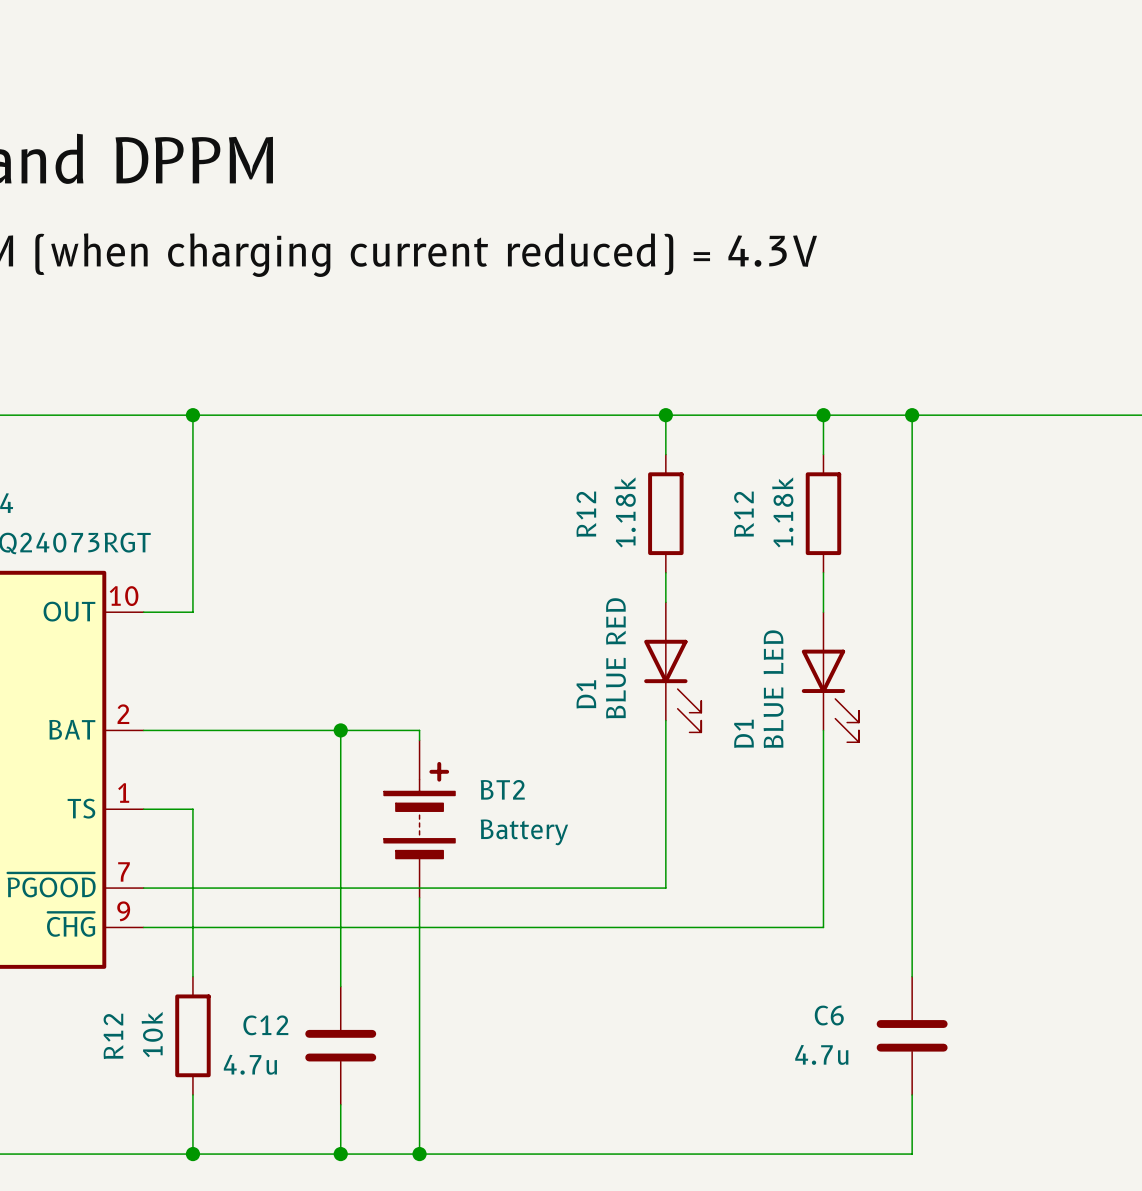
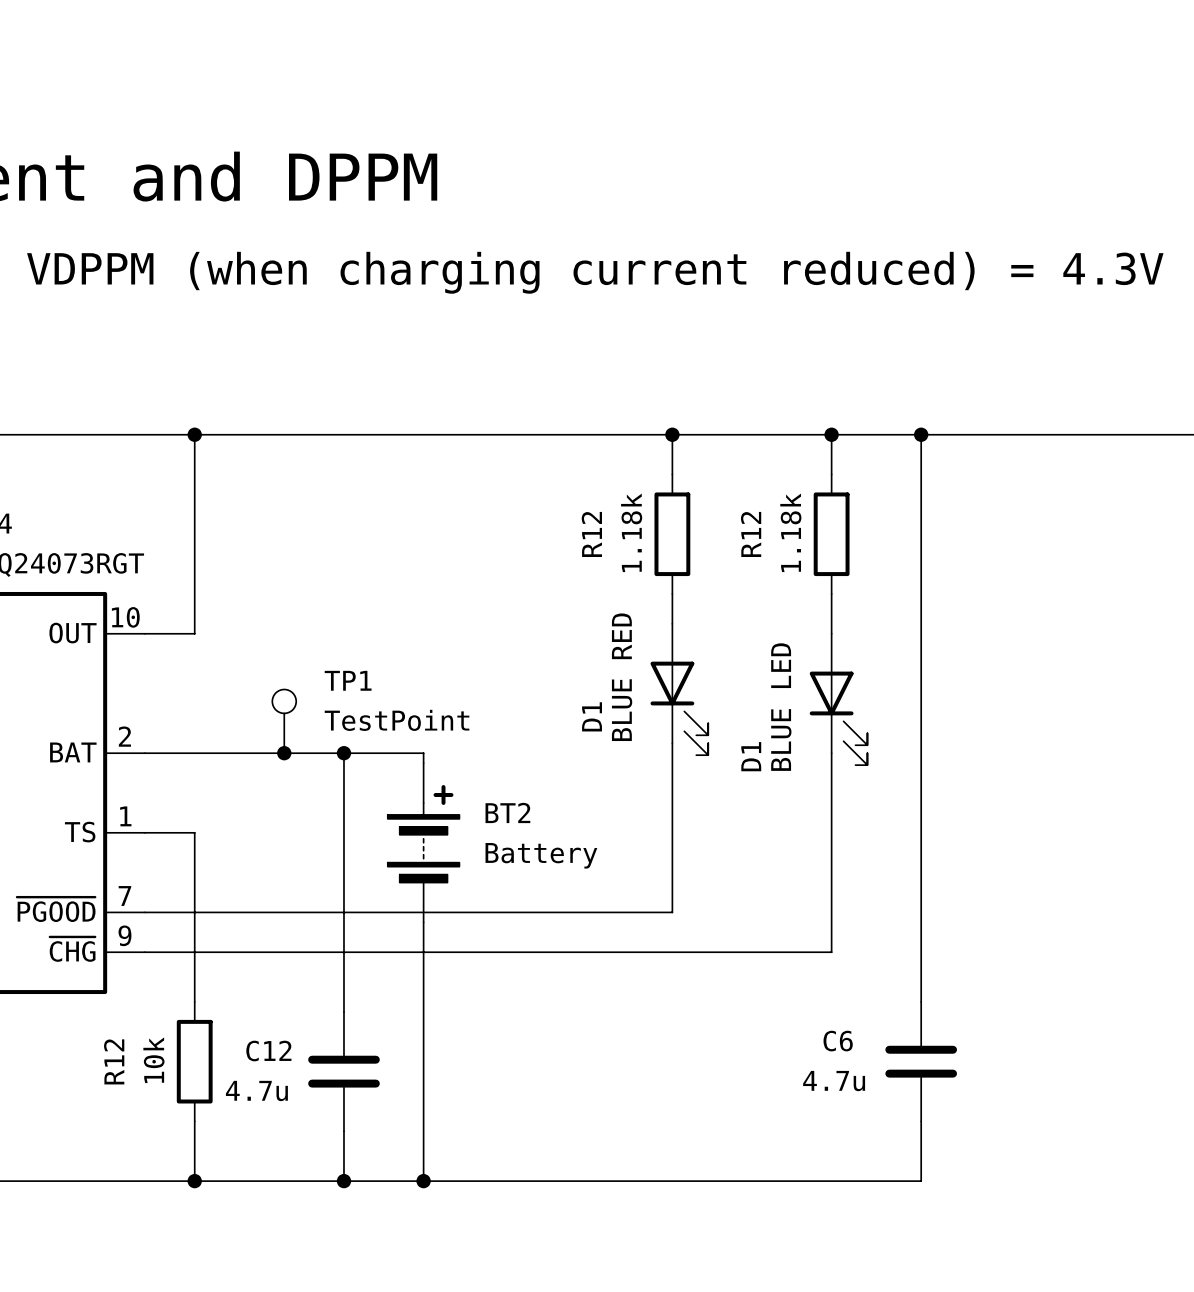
TP1: none -> TestPoint (284, 721)
junction: none -> (284, 753)

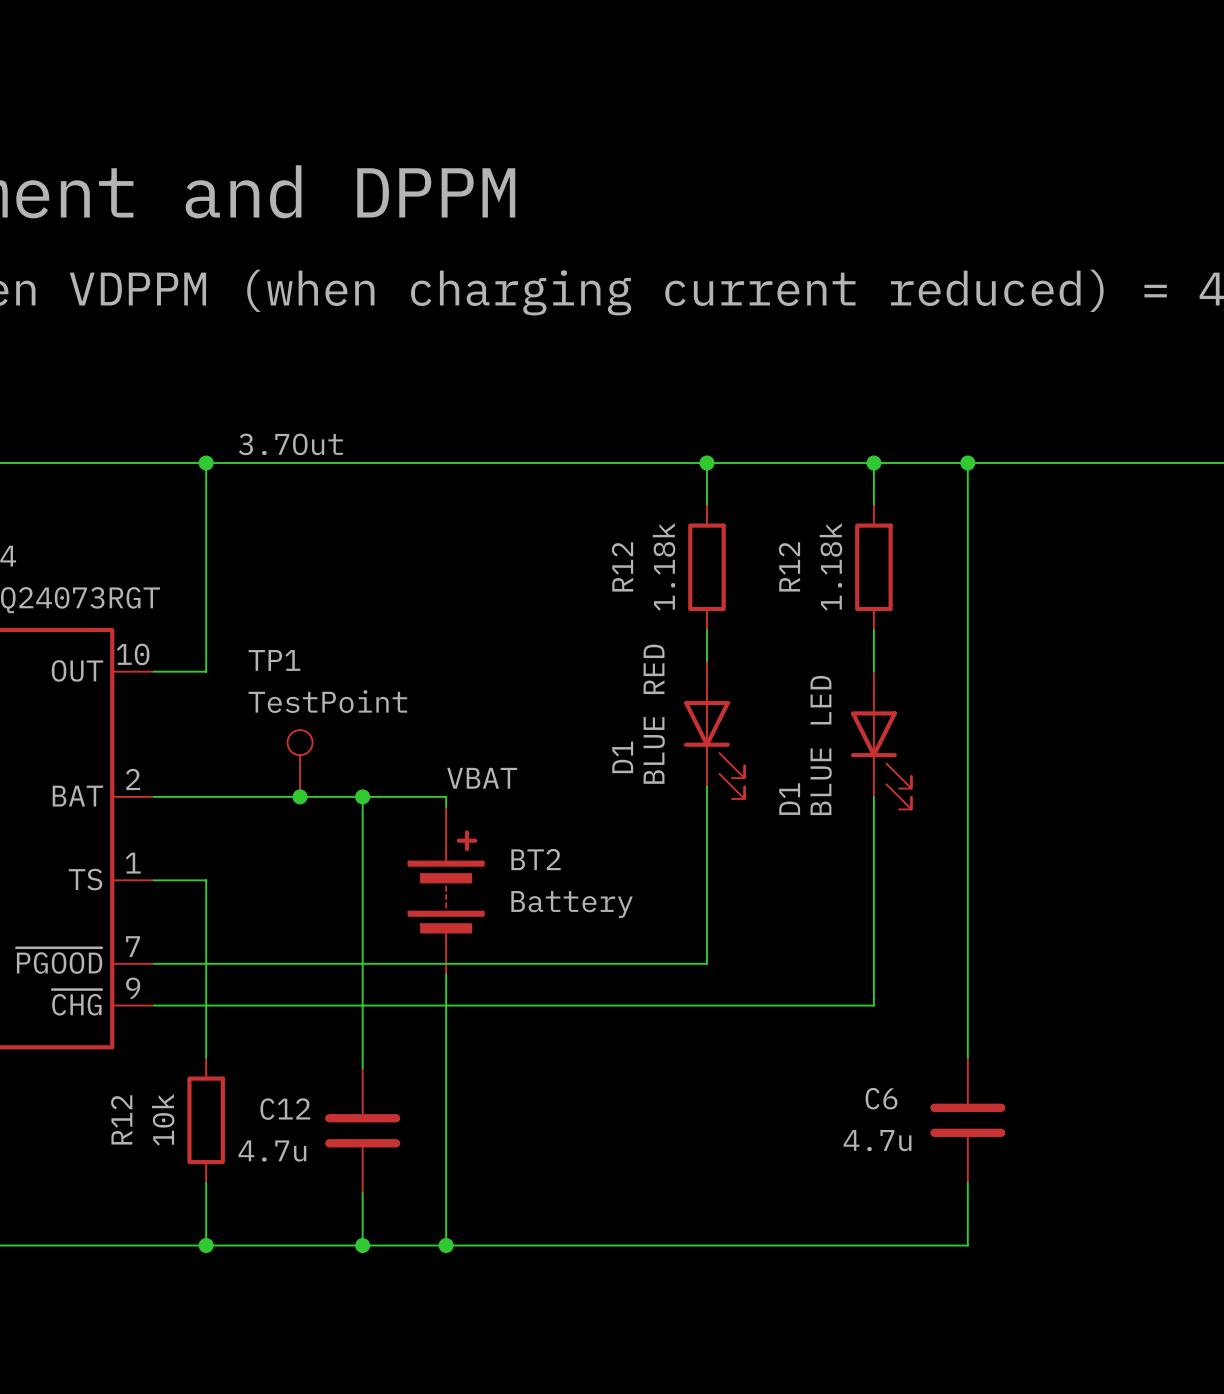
label: none -> 3.7Out (290, 444)
TP1 name position: TP1 (348, 680) -> TP1 (274, 660)
TP1 value position: TestPoint (397, 720) -> TestPoint (327, 701)
label: none -> VBAT (482, 778)

